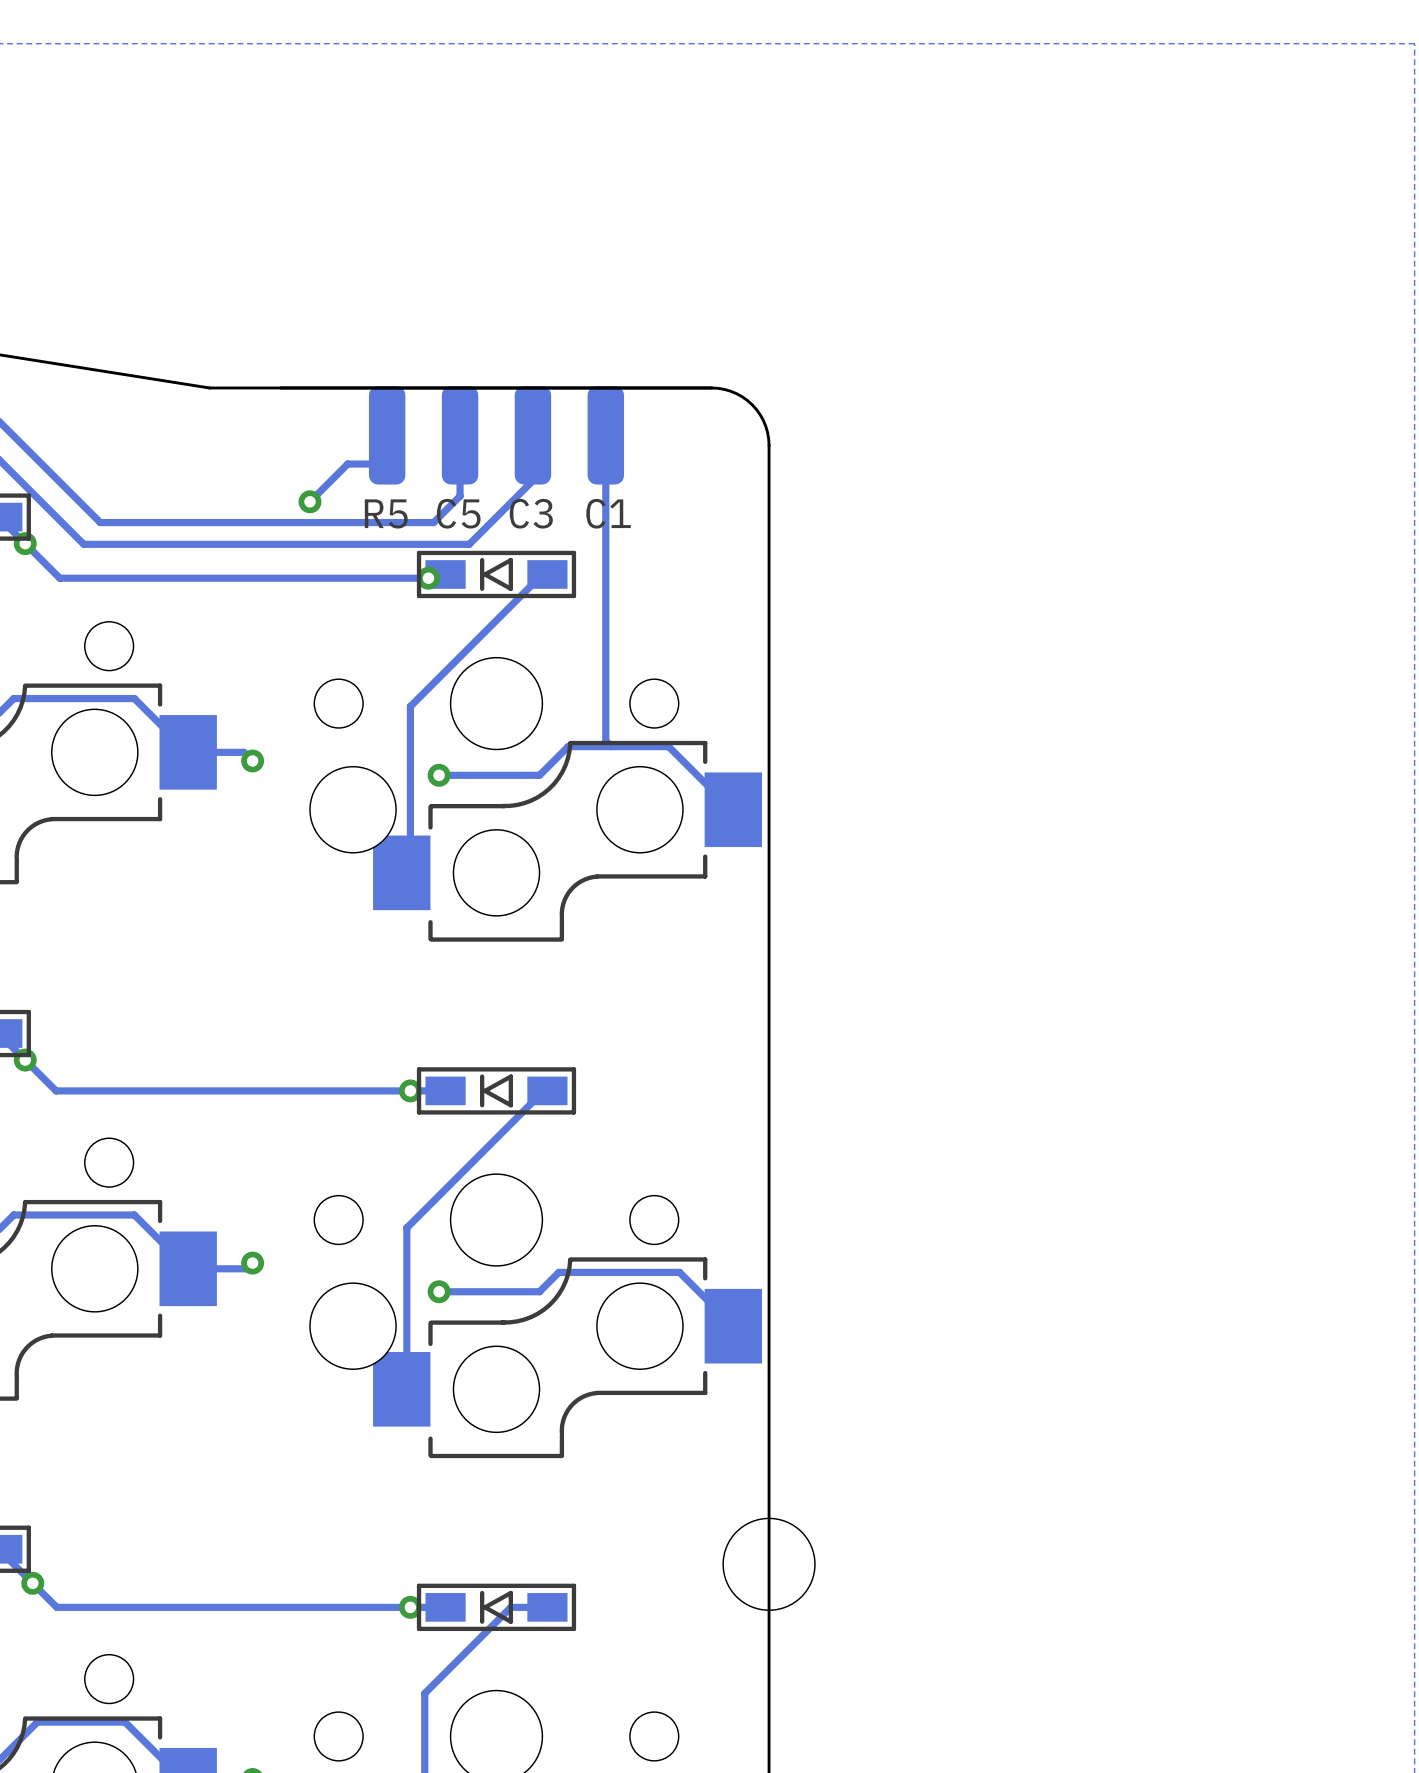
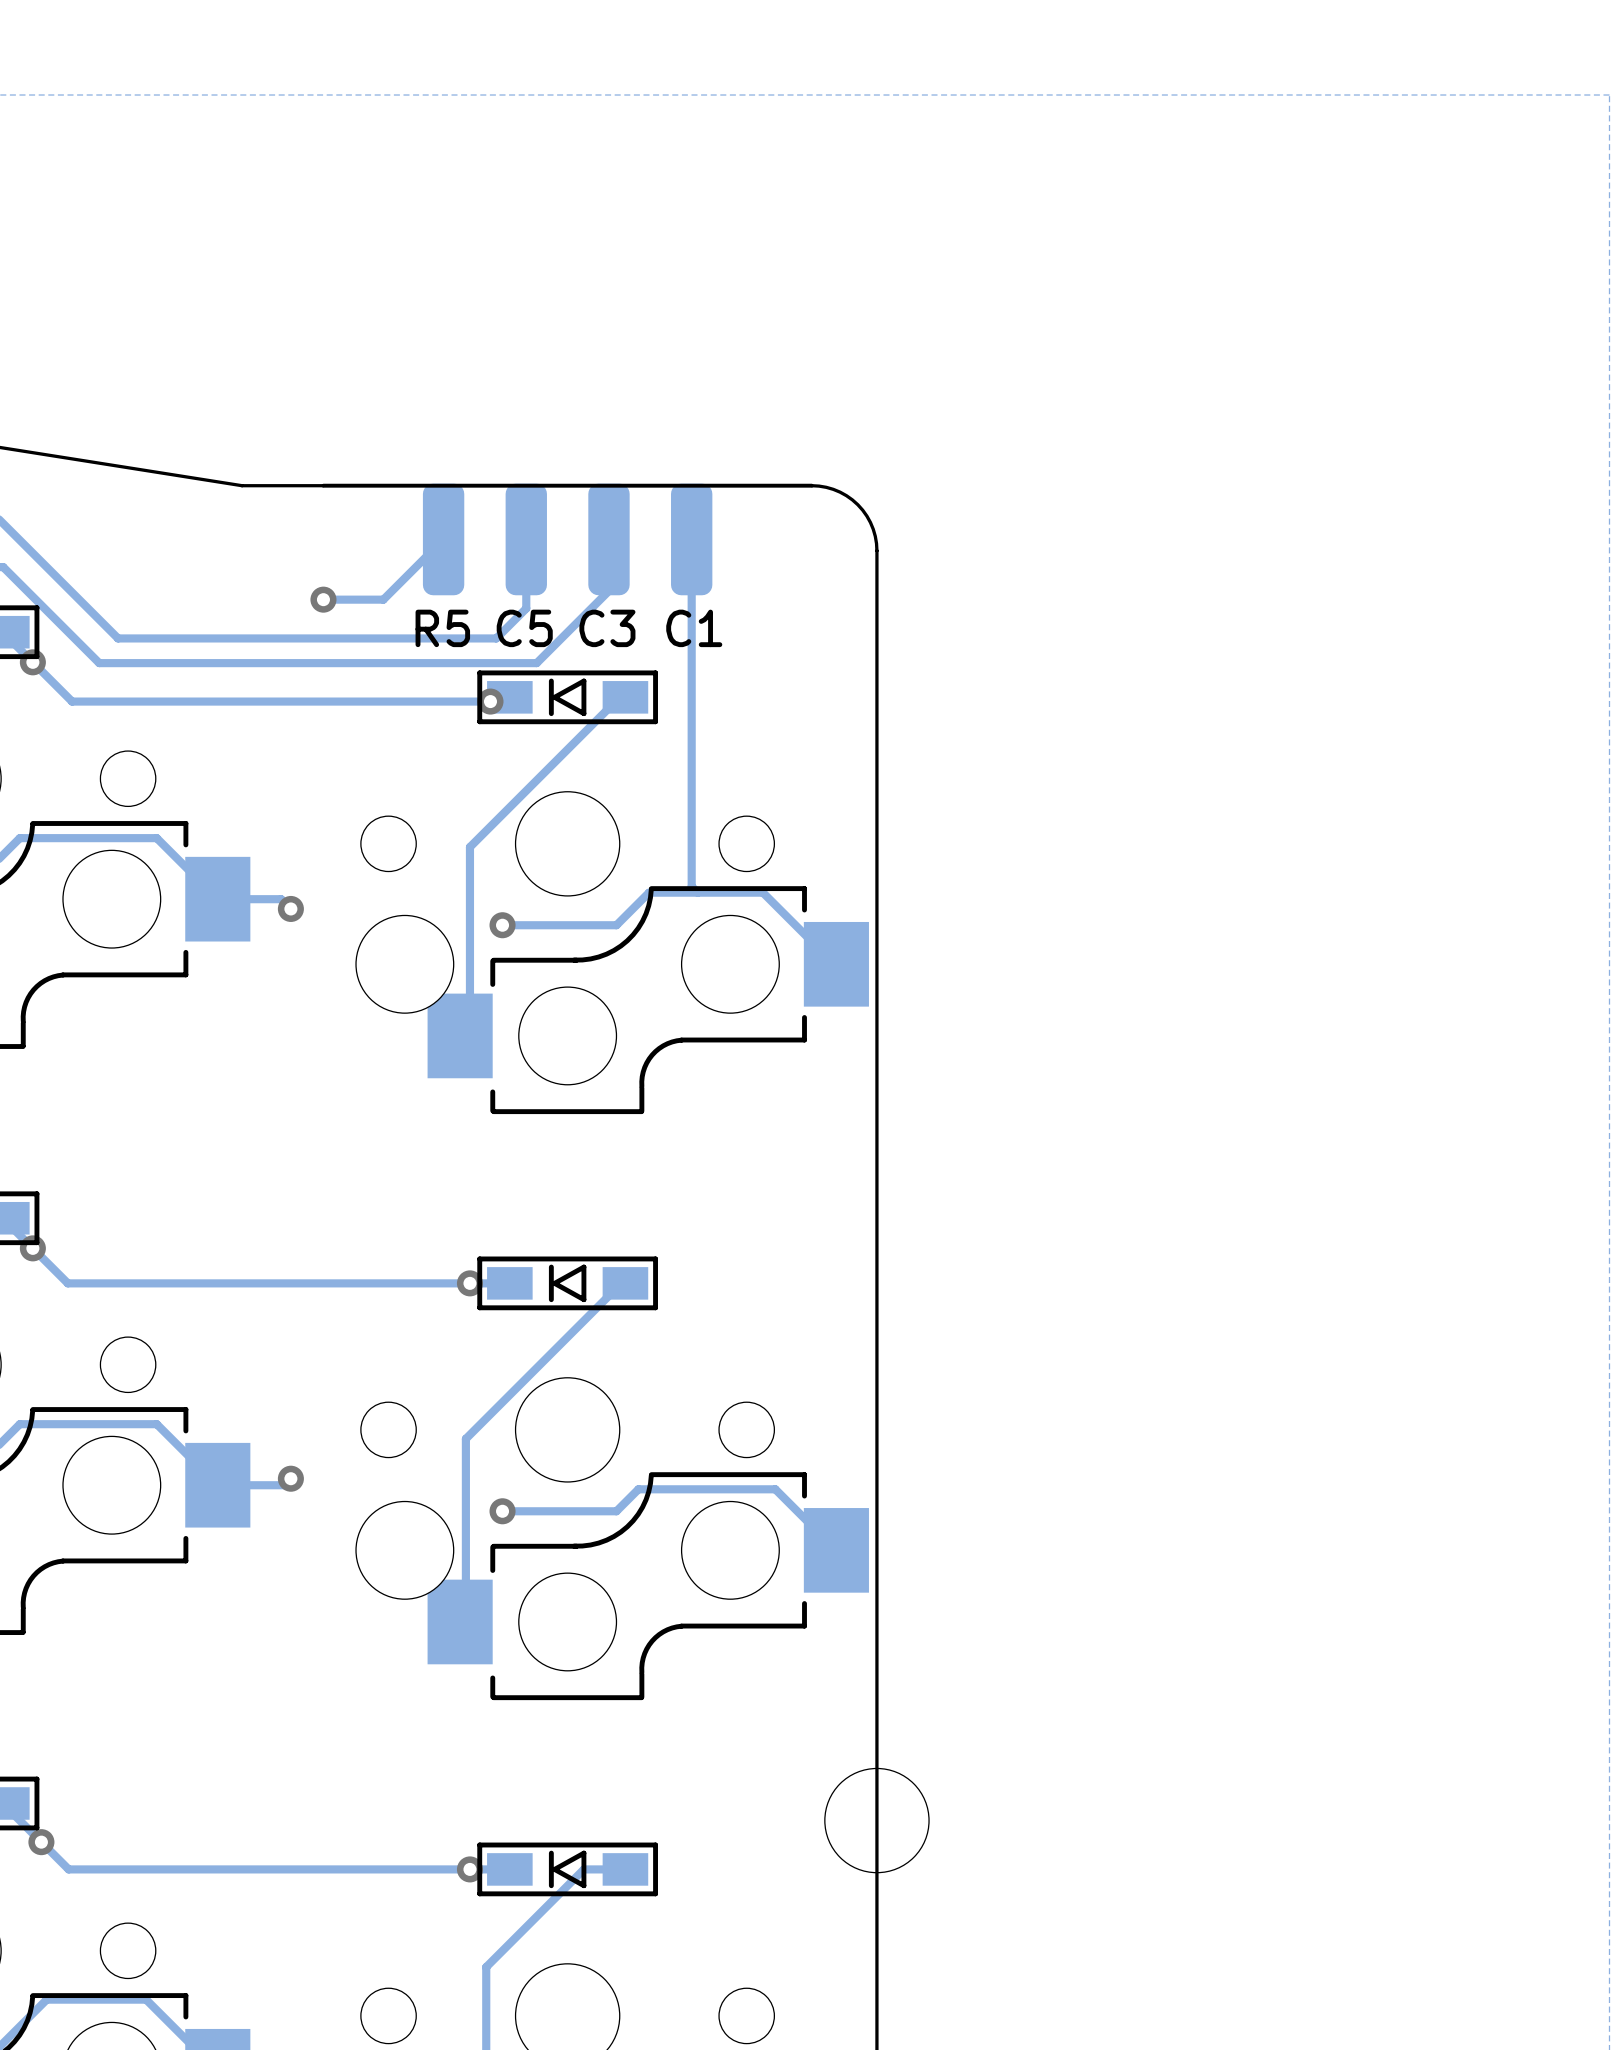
track: none -> (443, 539) (383, 599) (323, 599)
track: (387, 464) (347, 464) (309, 501) -> none
via position: (309, 501) -> (323, 599)

